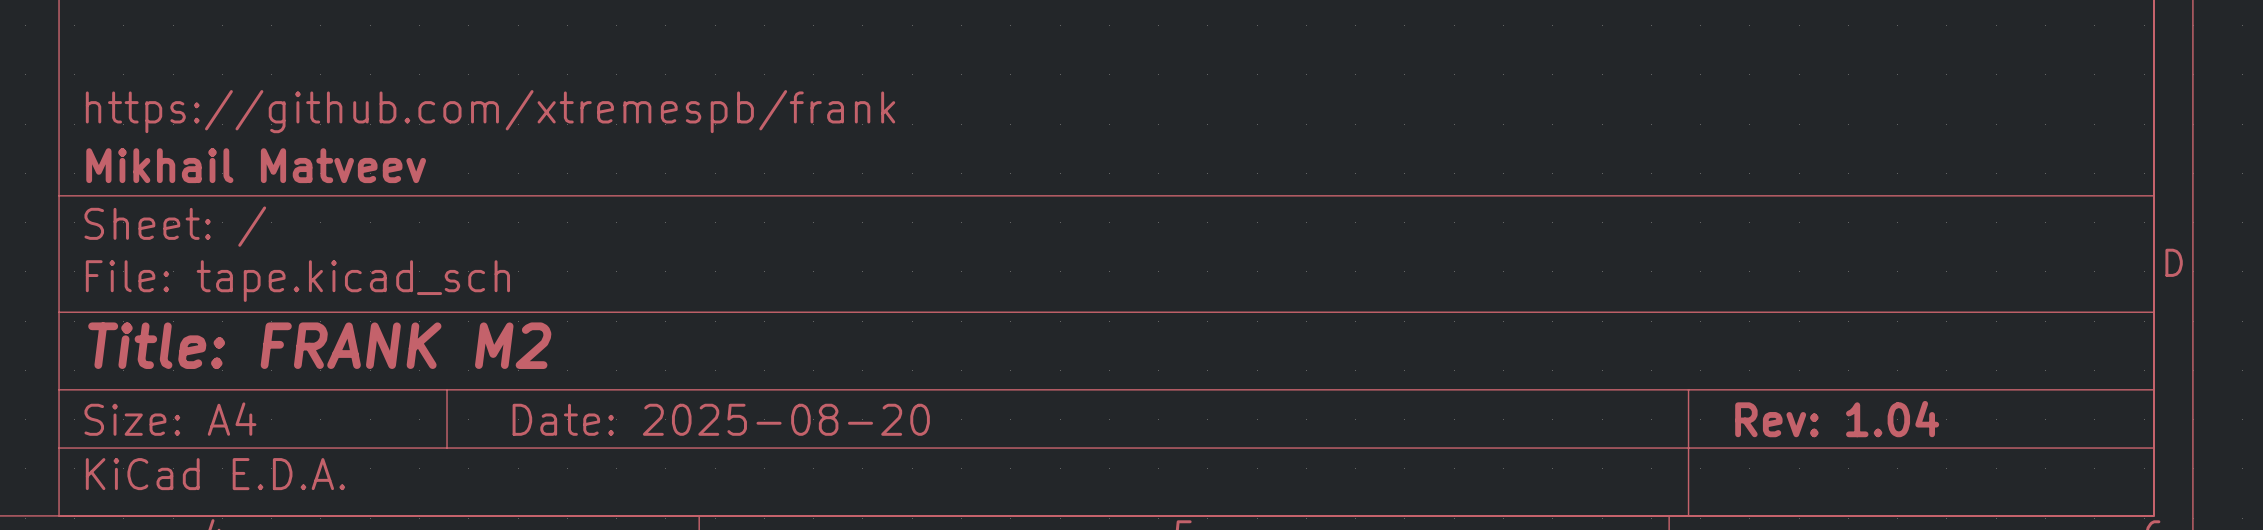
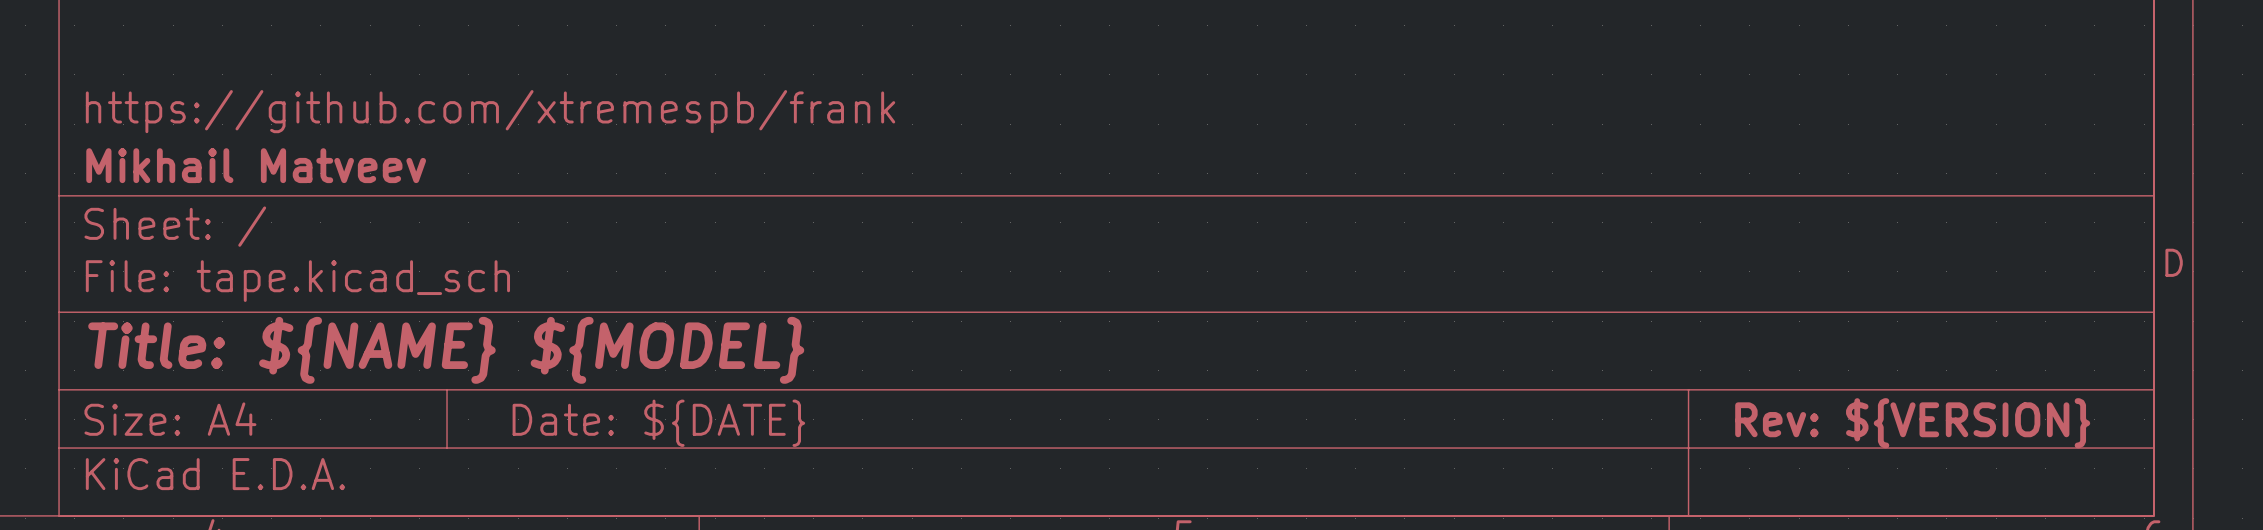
title block: Title: FRANK M2 (319, 345) -> Title: ${NAME} ${MODEL} (446, 350)
title block: Date: 2025-08-20 (721, 419) -> Date: ${DATE} (658, 423)
title block: Rev: 1.04 (1837, 419) -> Rev: ${VERSION} (1912, 423)

